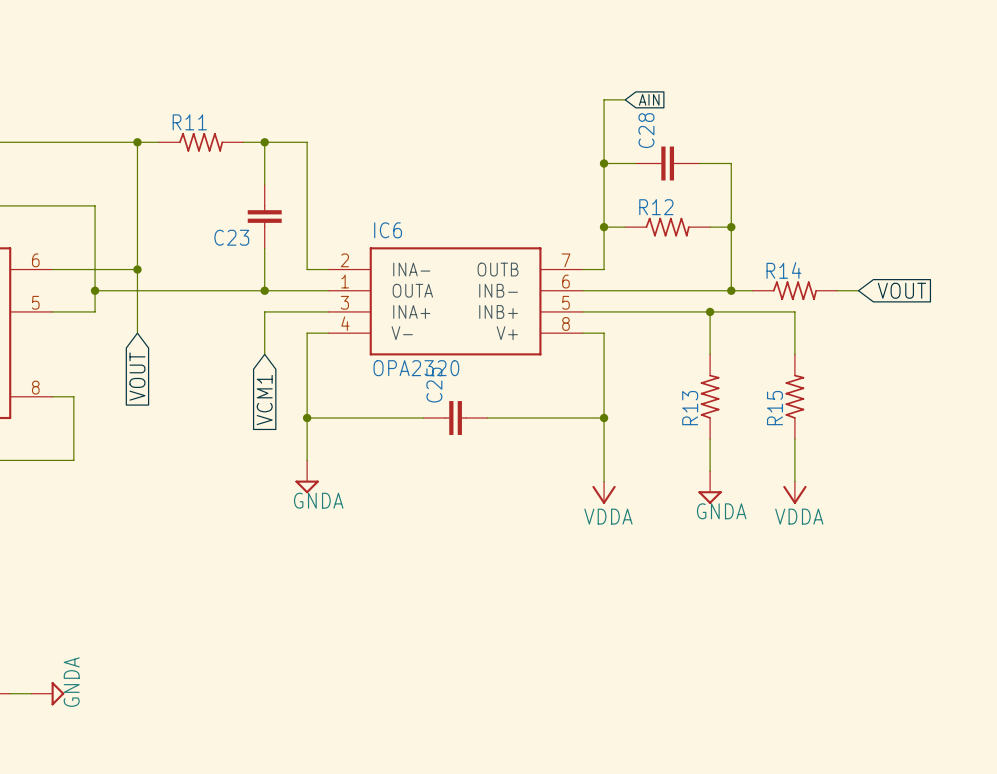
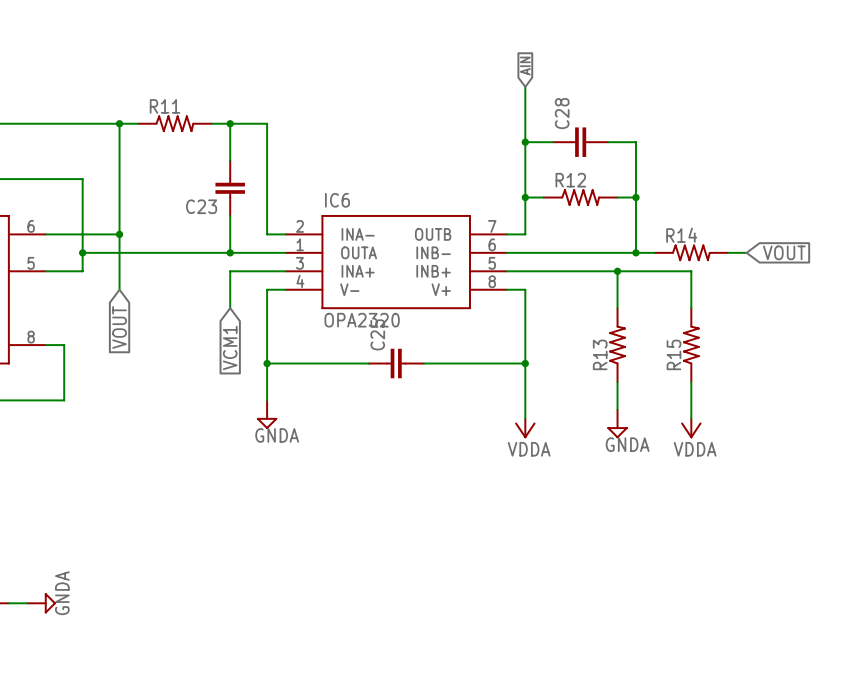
wire: (604, 99) (625, 99) -> none
global label rotation: 0° (649, 99) -> 90° counterclockwise (525, 66)
global label position: AIN (649, 99) -> AIN (525, 66)

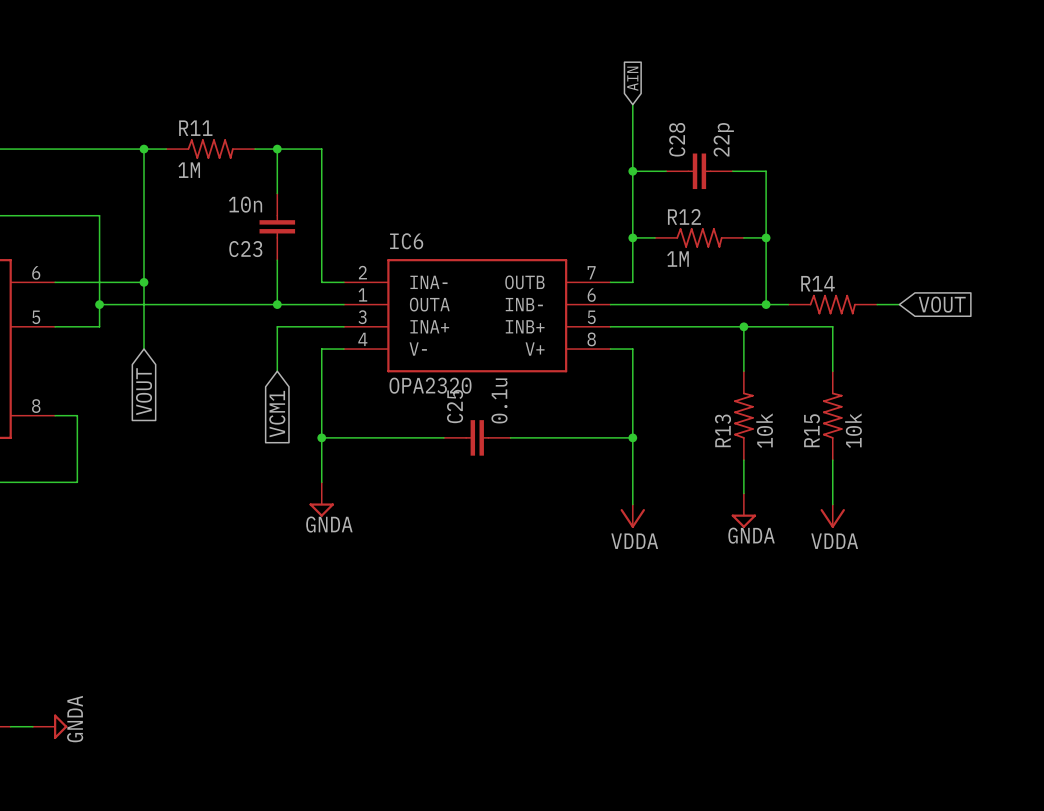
C28 value: none -> 22p (723, 139)
R11 value: none -> 1M (189, 170)
C23 value: none -> 10n (245, 204)
R12 value: none -> 1M (678, 259)
C25 value: none -> 0.1u (499, 400)
R13 value: none -> 10k (764, 430)
R15 value: none -> 10k (853, 430)

